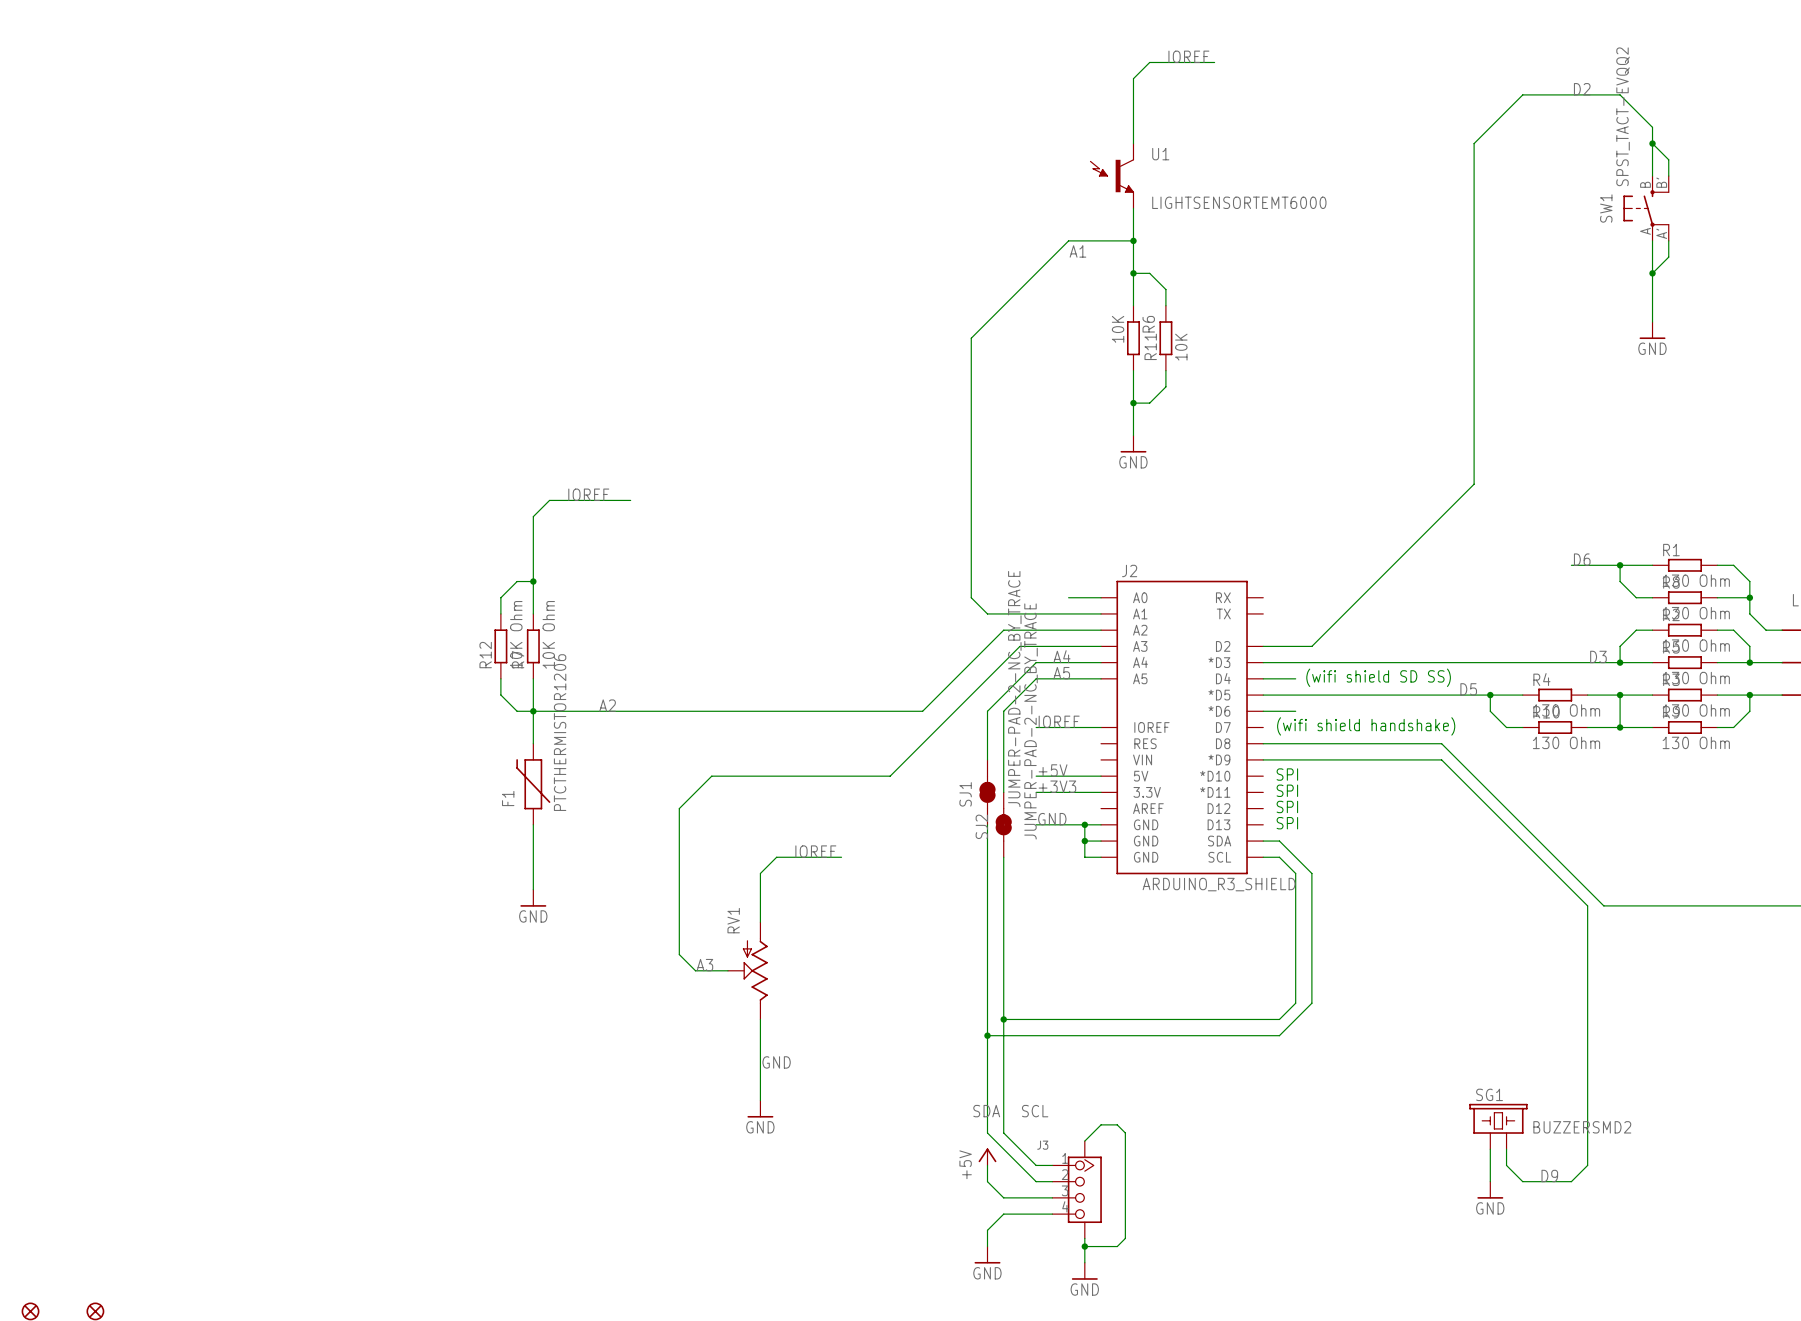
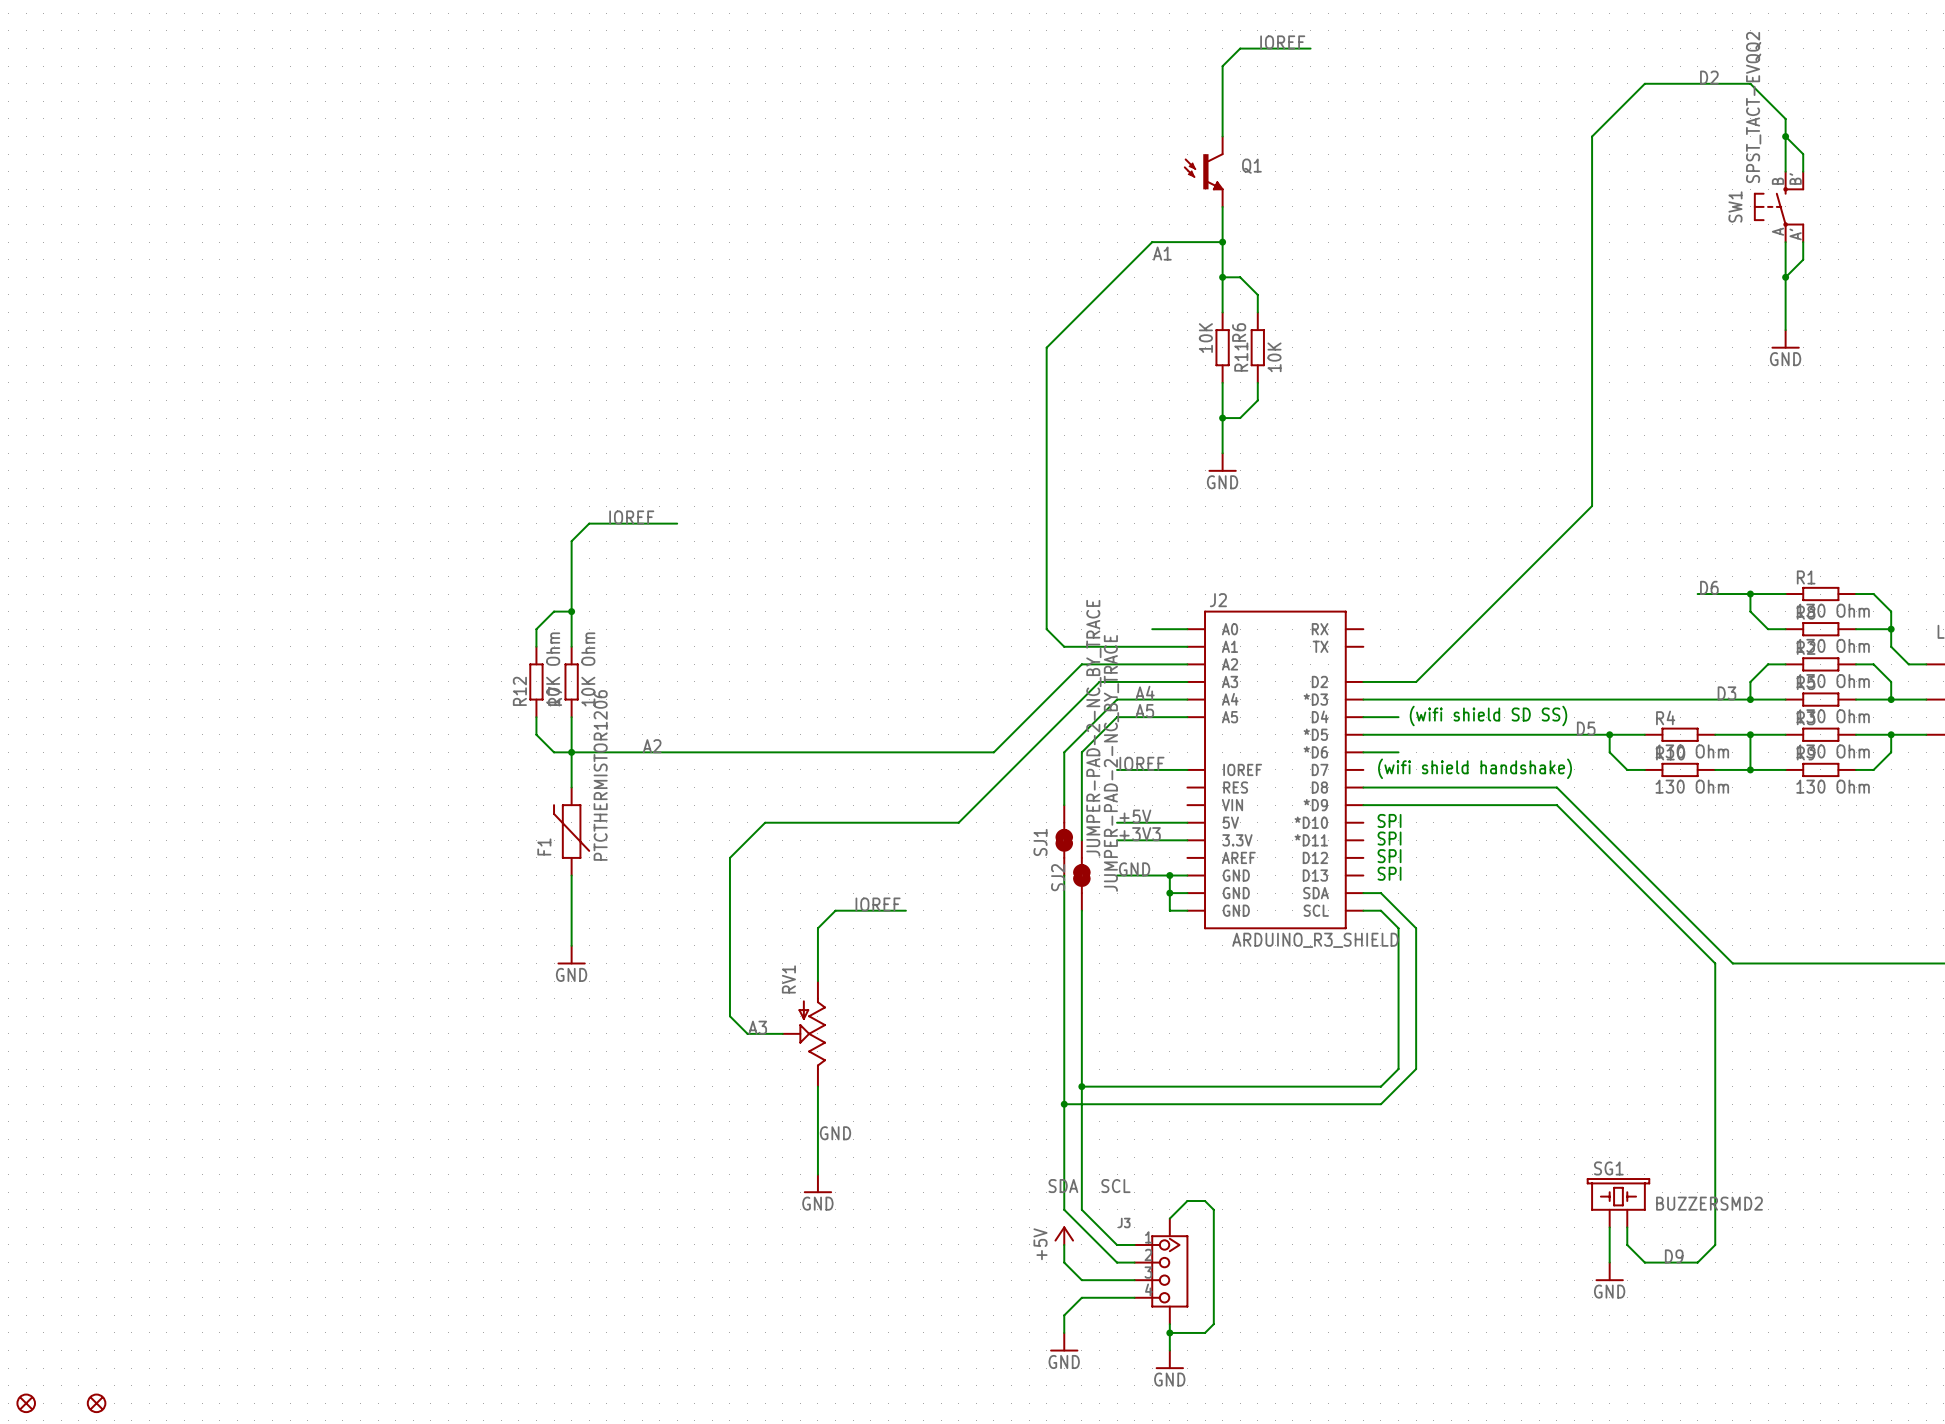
U1: LIGHTSENSORTEMT6000 (1111, 176) -> none
Q1: none -> (1203, 171)

